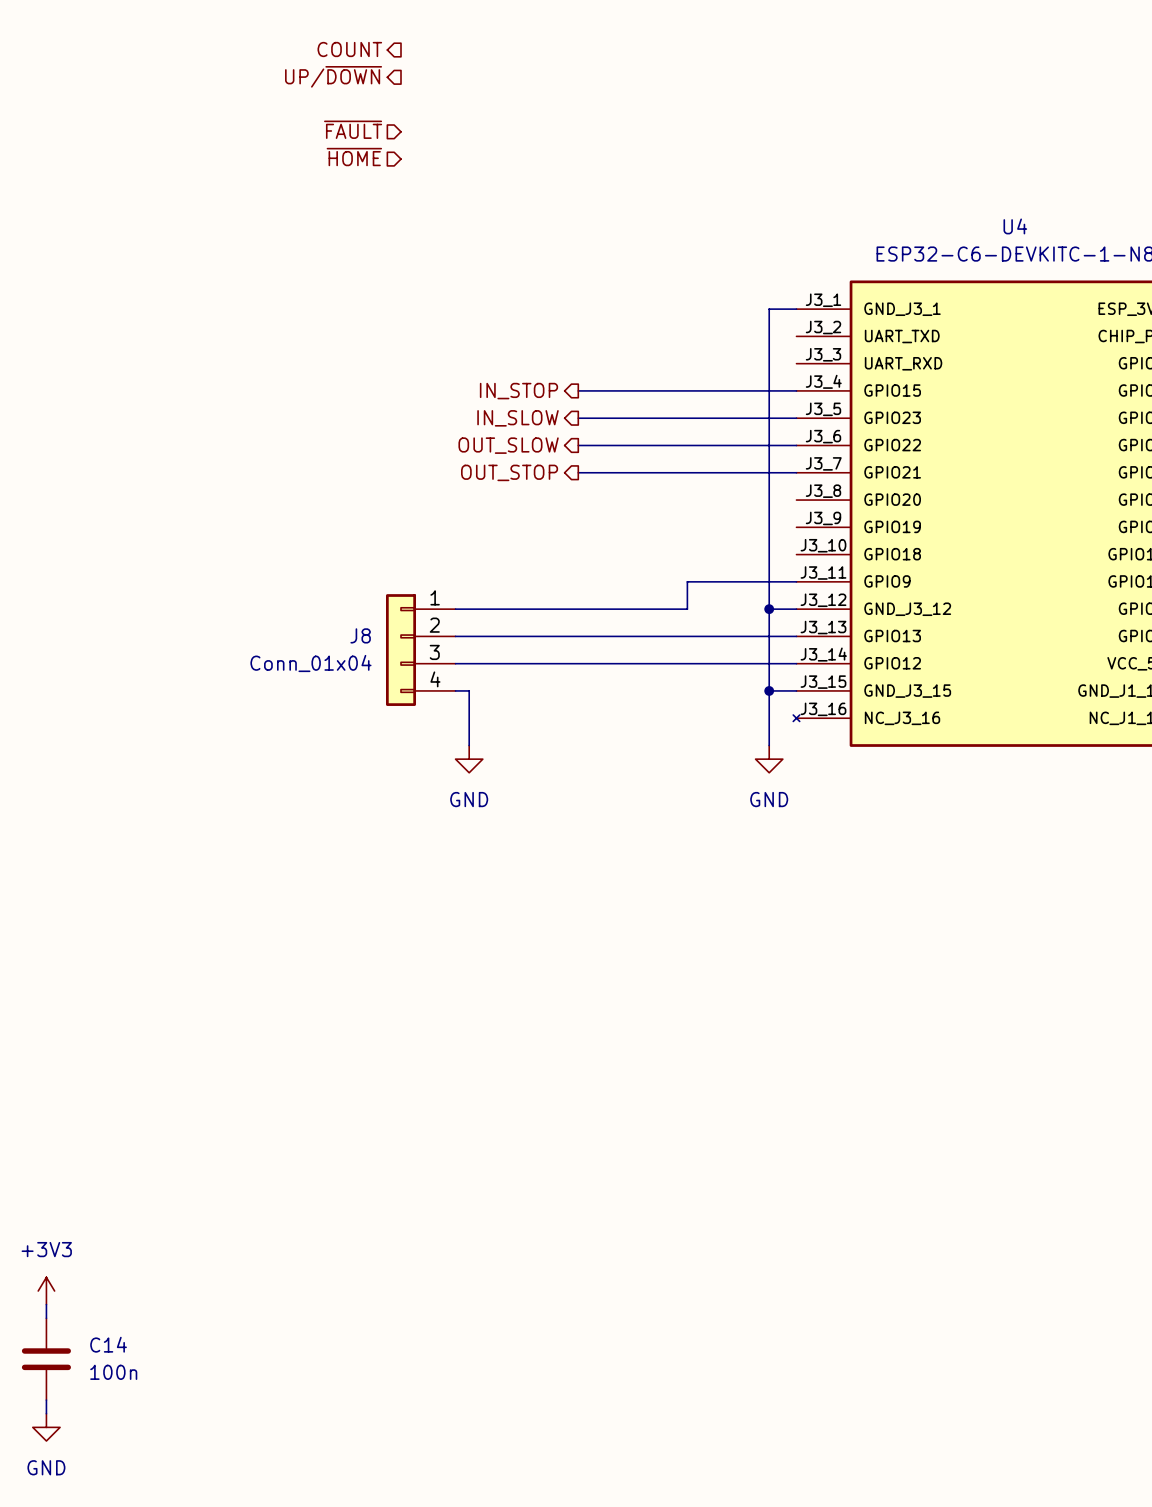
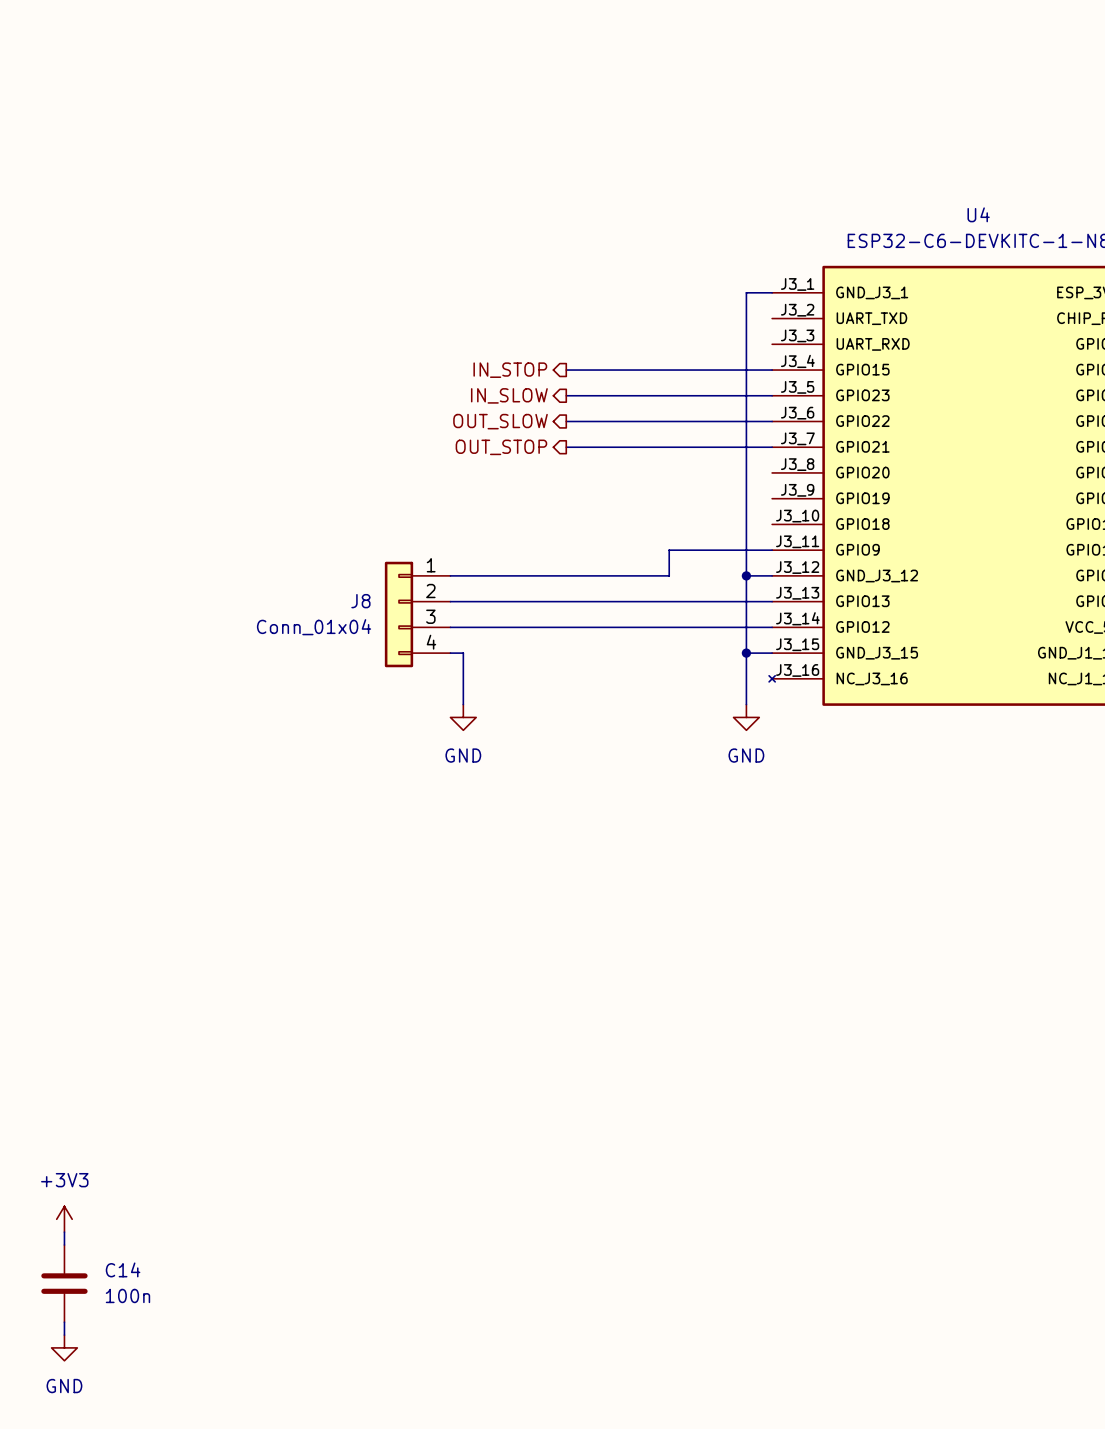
hierarchical label: COUNT (349, 49) -> none
hierarchical label: UP/~{DOWN} (333, 76) -> none
hierarchical label: ~{FAULT} (353, 129) -> none
hierarchical label: ~{HOME} (354, 157) -> none

